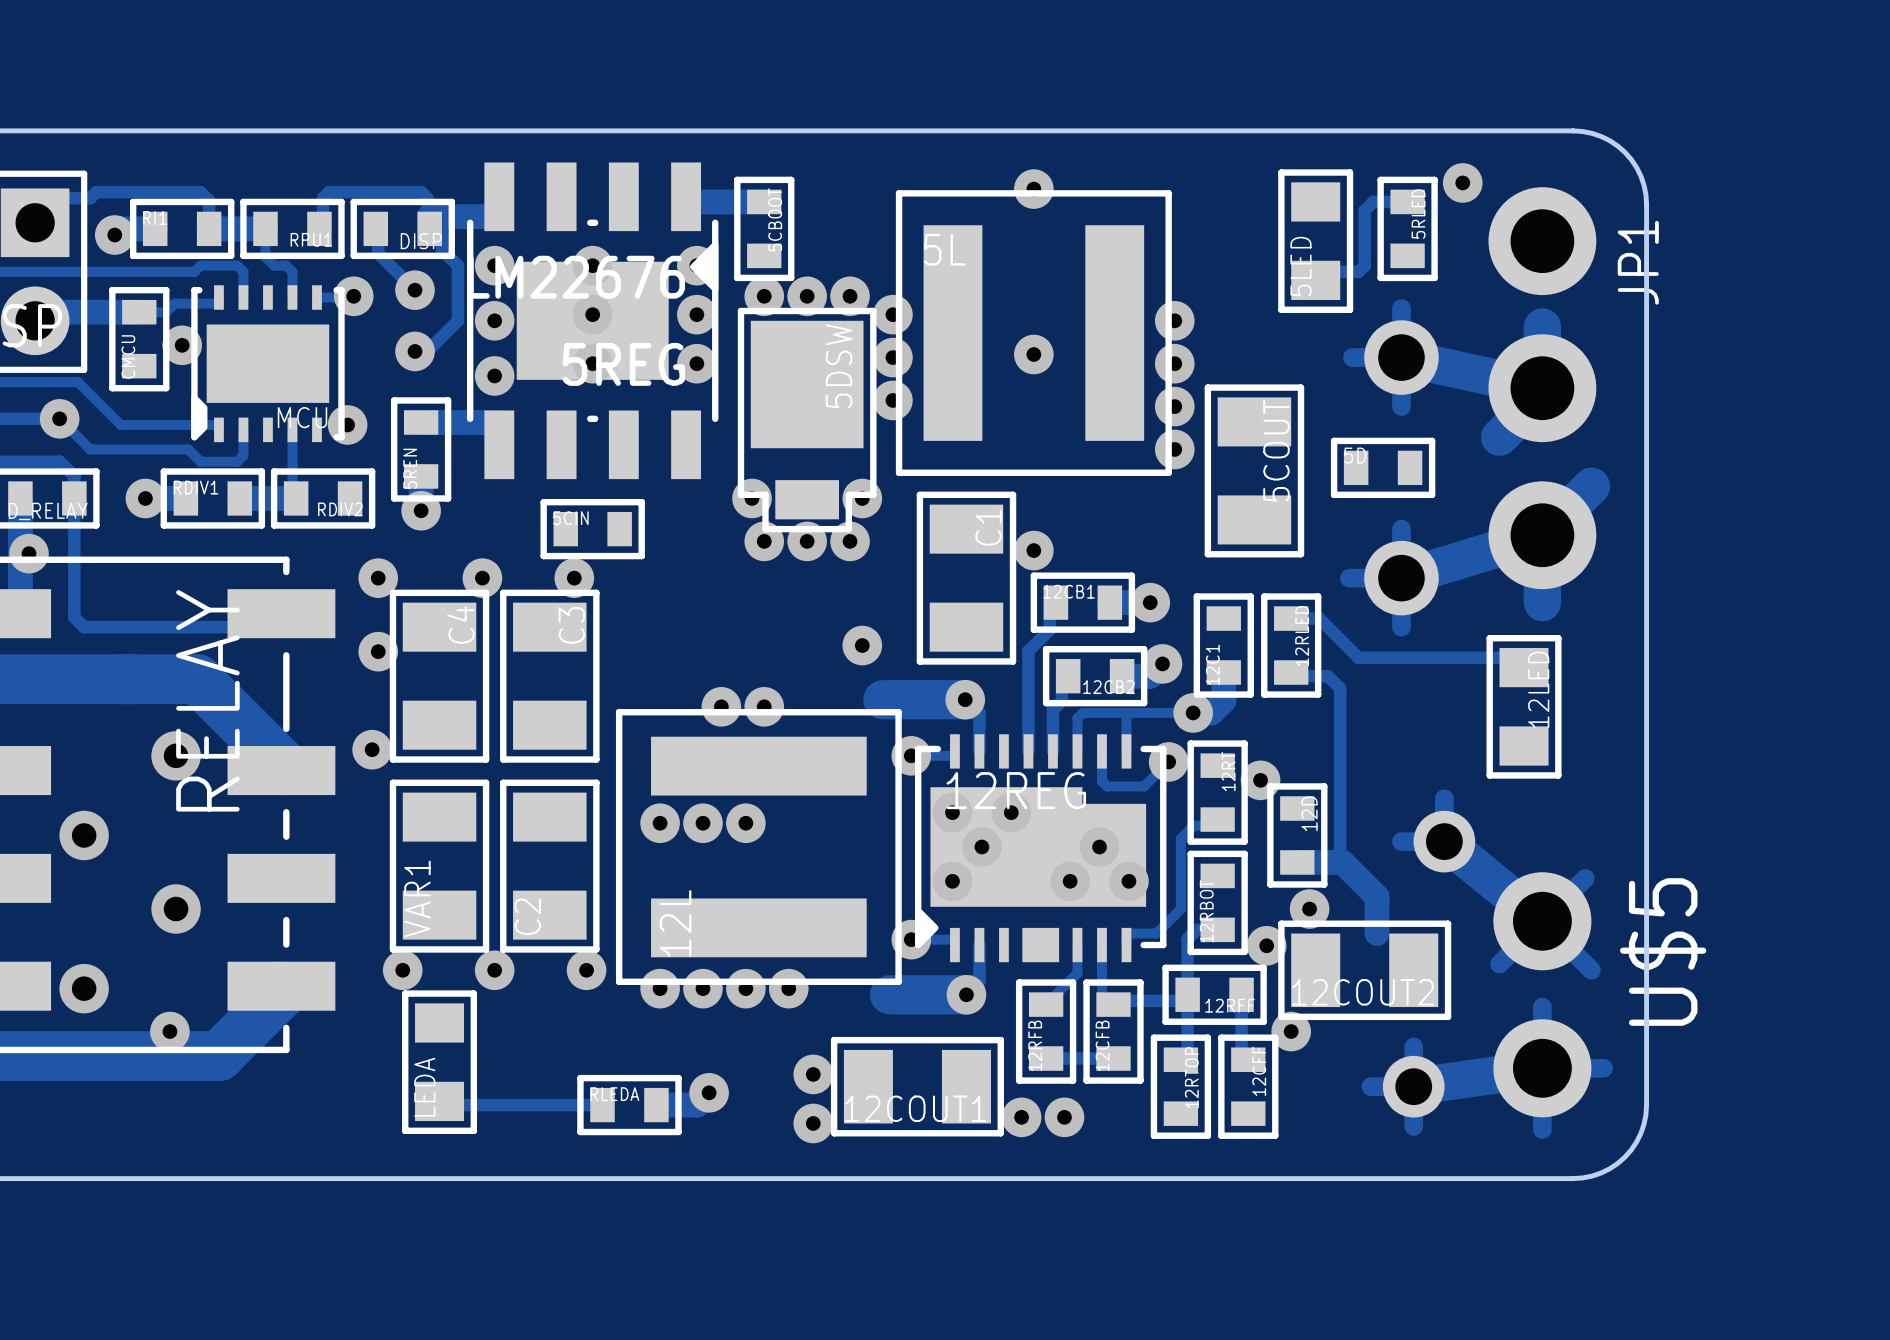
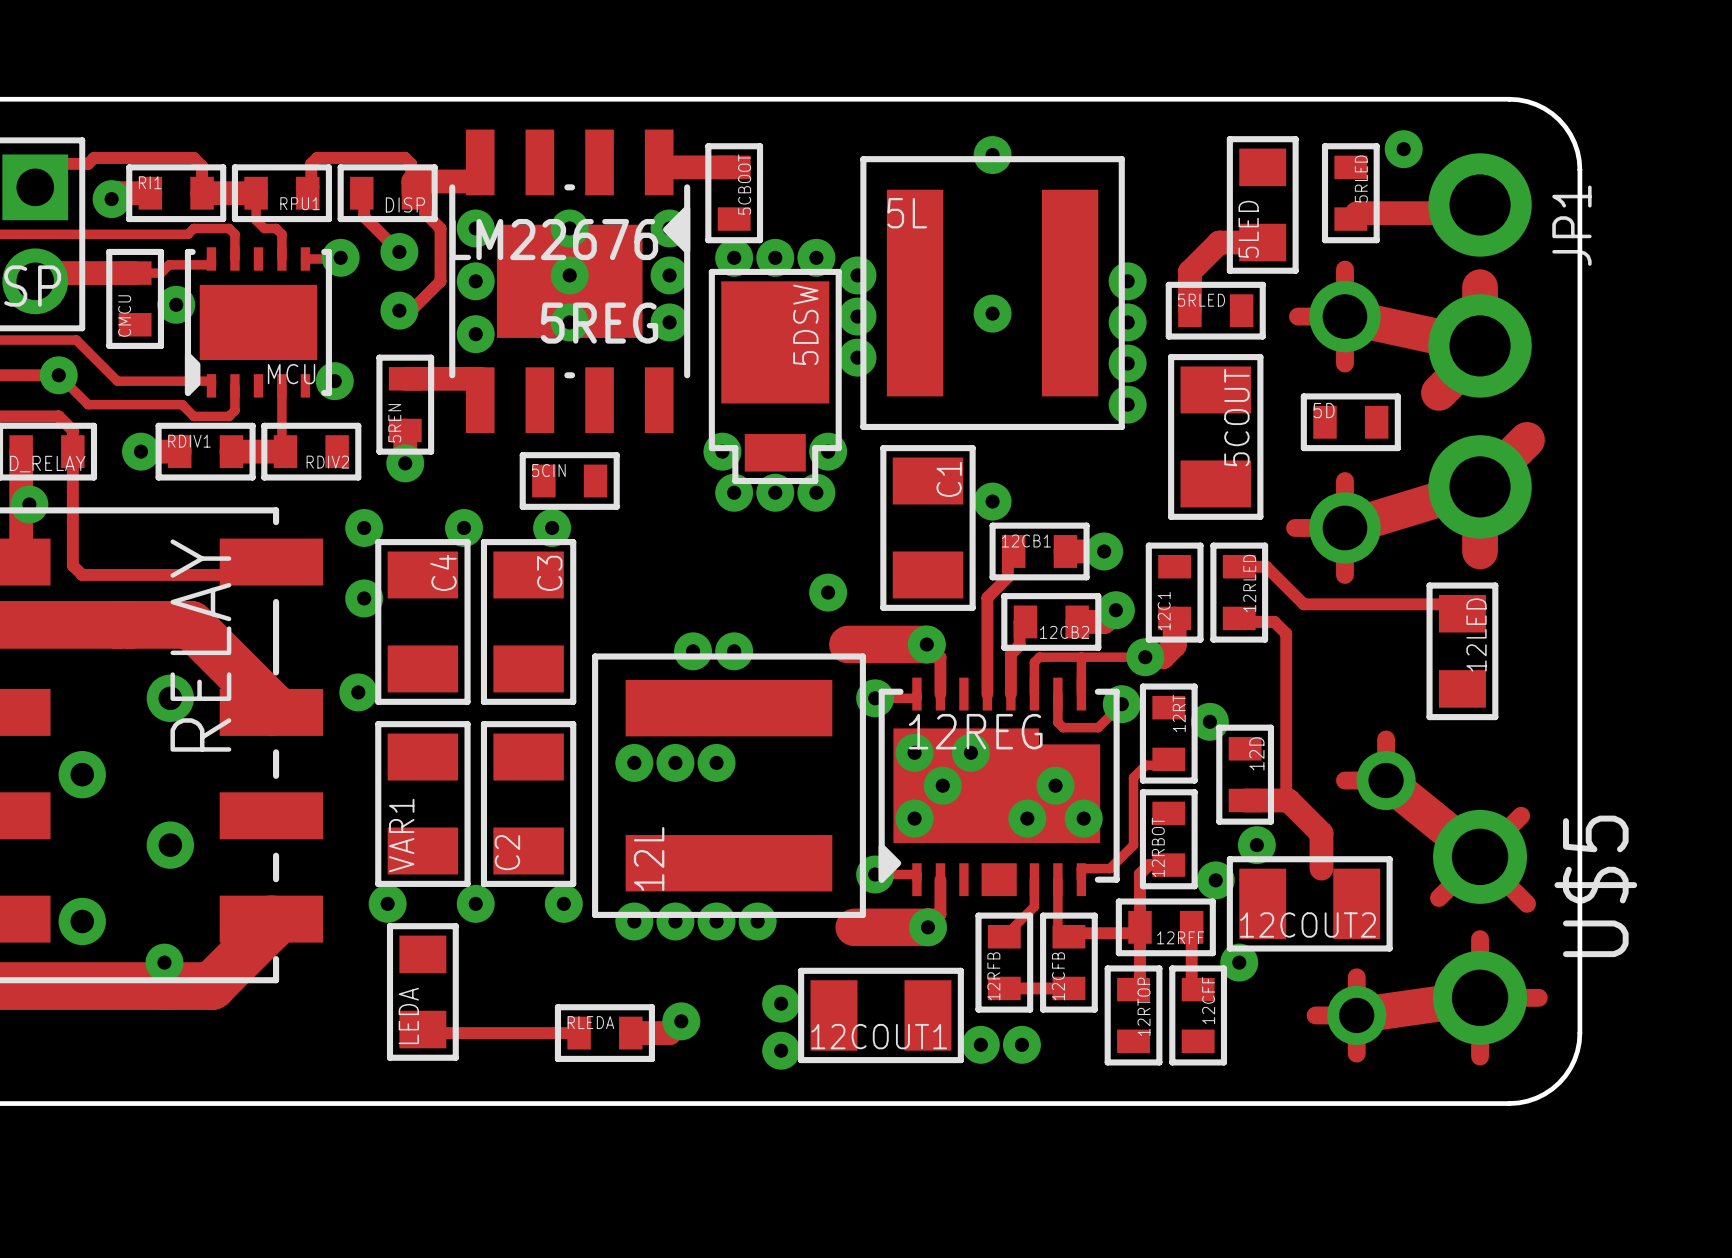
track: (1407, 201) (1373, 201) (1364, 210) (1364, 265) (1358, 271) (1324, 271) (1315, 280) -> (1189, 310) (1189, 271) (1219, 242) (1262, 242)
track: none -> (1480, 204) (1471, 213) (1356, 213)
5RLED: none -> (1215, 310)
5D position: (1383, 467) -> (1350, 422)
5COUT position: (1254, 470) -> (1215, 436)

